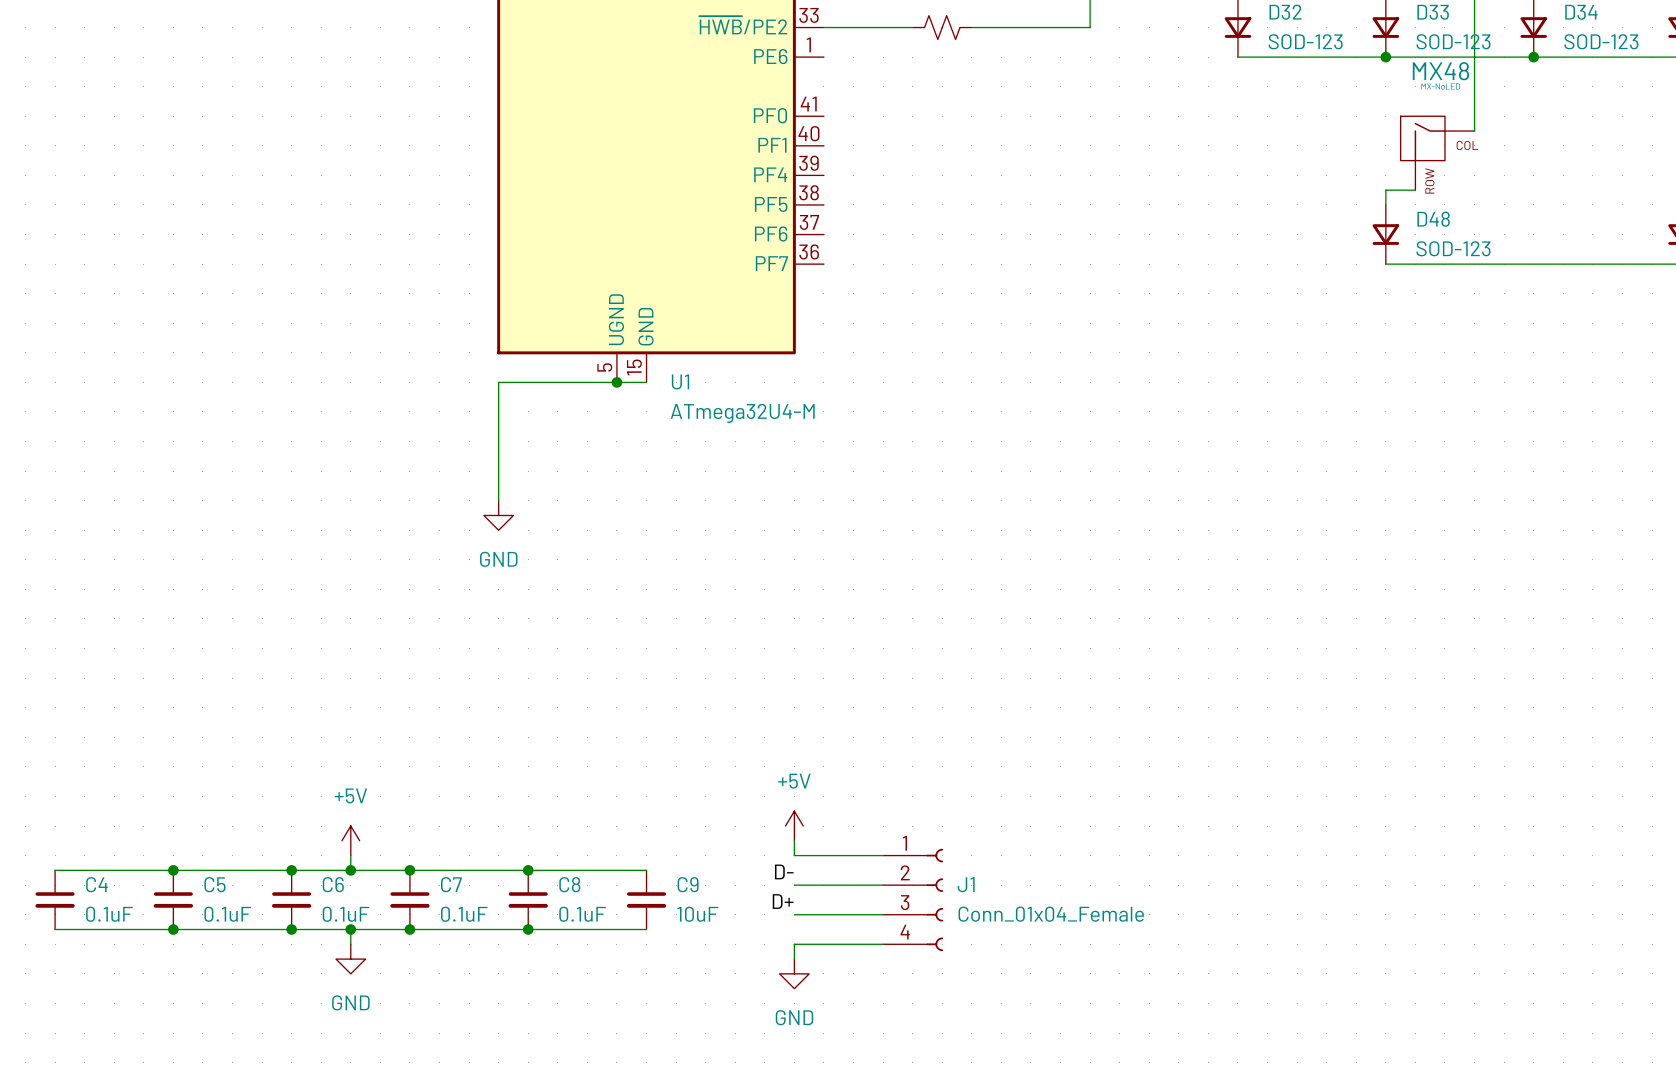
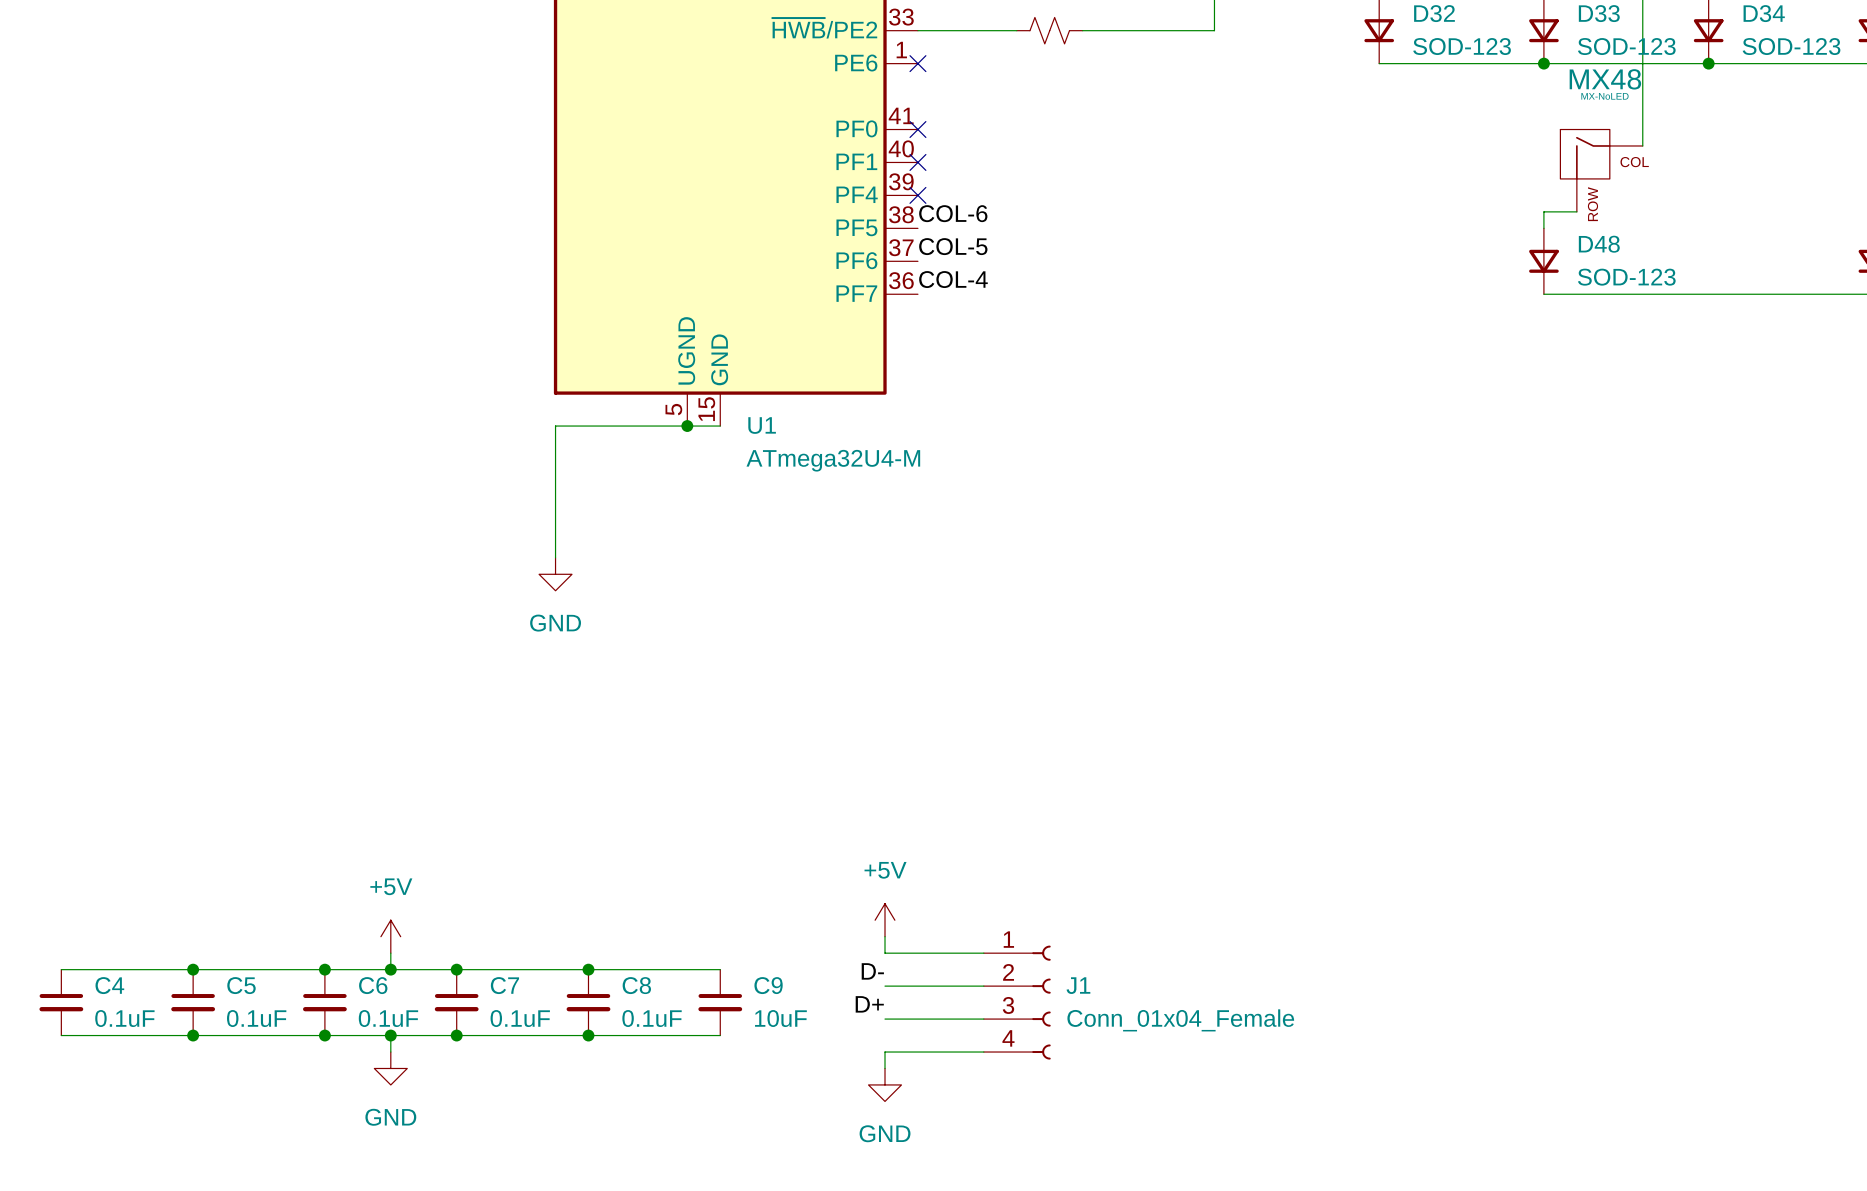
no-connect mark: none -> (917, 63)
no-connect mark: none -> (917, 129)
no-connect mark: none -> (917, 162)
no-connect mark: none -> (917, 195)
label: none -> COL-6 (953, 213)
label: none -> COL-5 (953, 246)
label: none -> COL-4 (953, 279)

